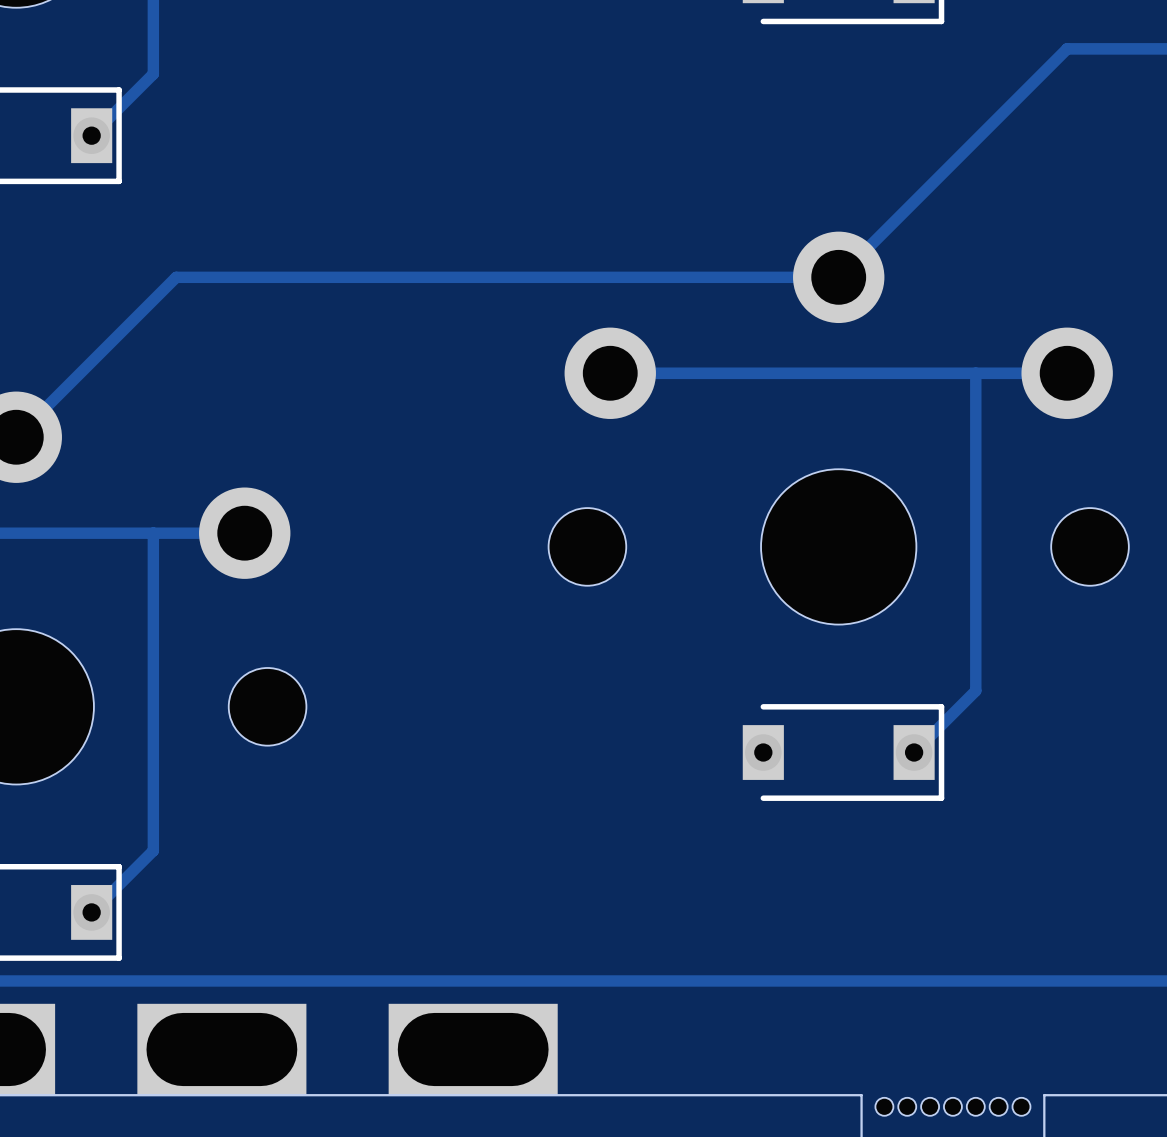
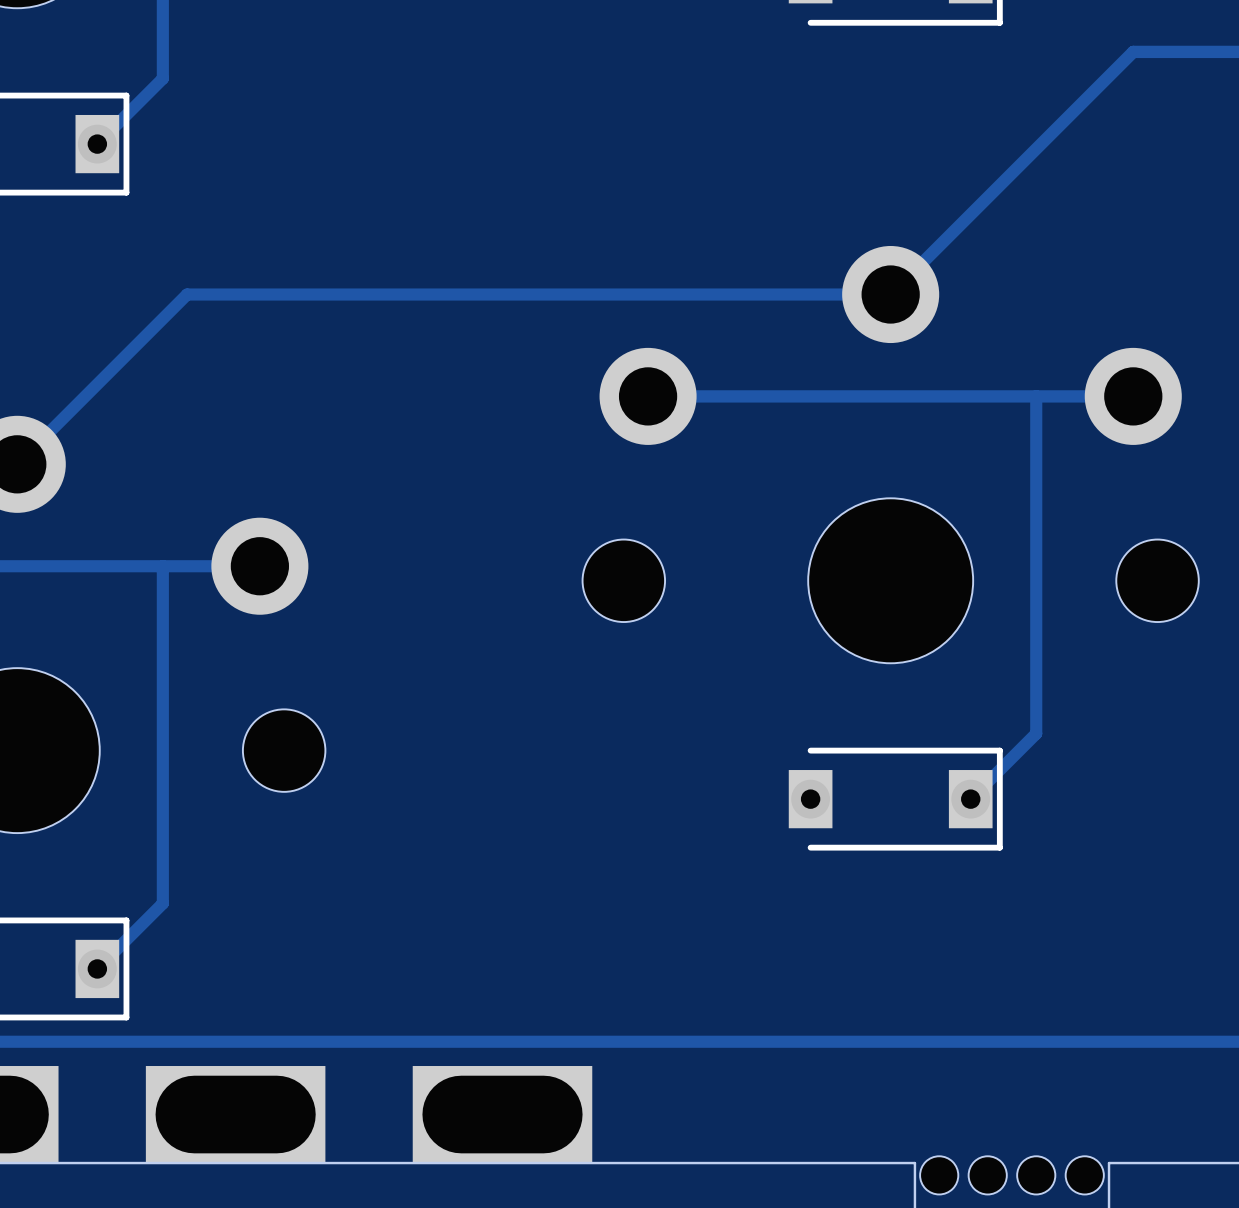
part footprint: [875, 1097, 894, 1116] -> [920, 1156, 959, 1195]
part footprint: [921, 1097, 940, 1116] -> [968, 1156, 1007, 1195]
part footprint: [966, 1097, 985, 1116] -> [1017, 1156, 1056, 1195]
part footprint: [1012, 1097, 1031, 1116] -> [1065, 1156, 1104, 1195]
part: (907, 1106) -> none
part: (952, 1106) -> none
part: (998, 1106) -> none

